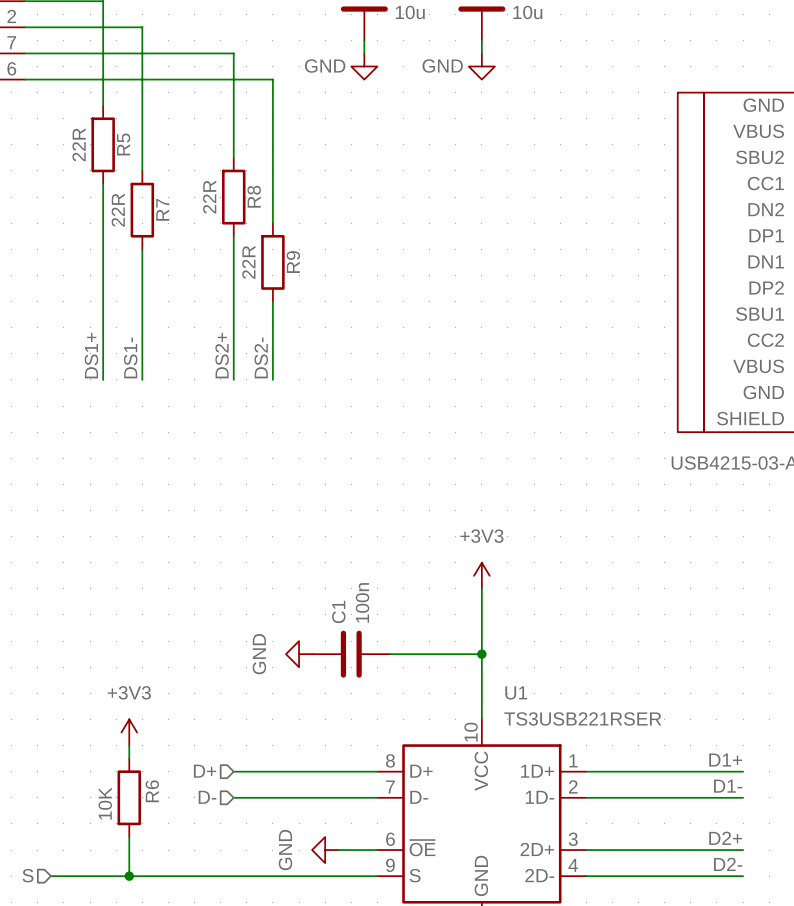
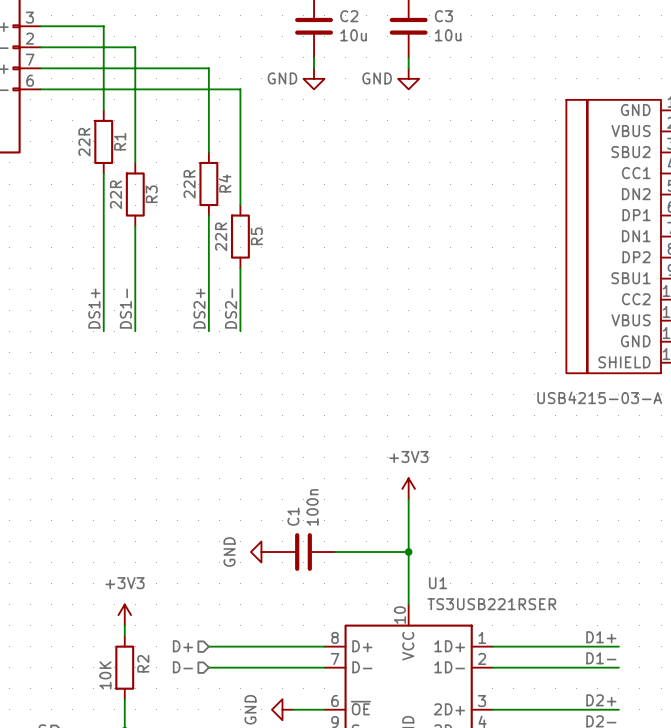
R5 name: R5 (123, 144) -> R1 (120, 141)
R8 name: R8 (254, 196) -> R4 (225, 183)
R7 name: R7 (162, 209) -> R3 (151, 194)
R9 name: R9 (293, 262) -> R5 (256, 236)
R6 name: R6 (152, 791) -> R2 (143, 663)

